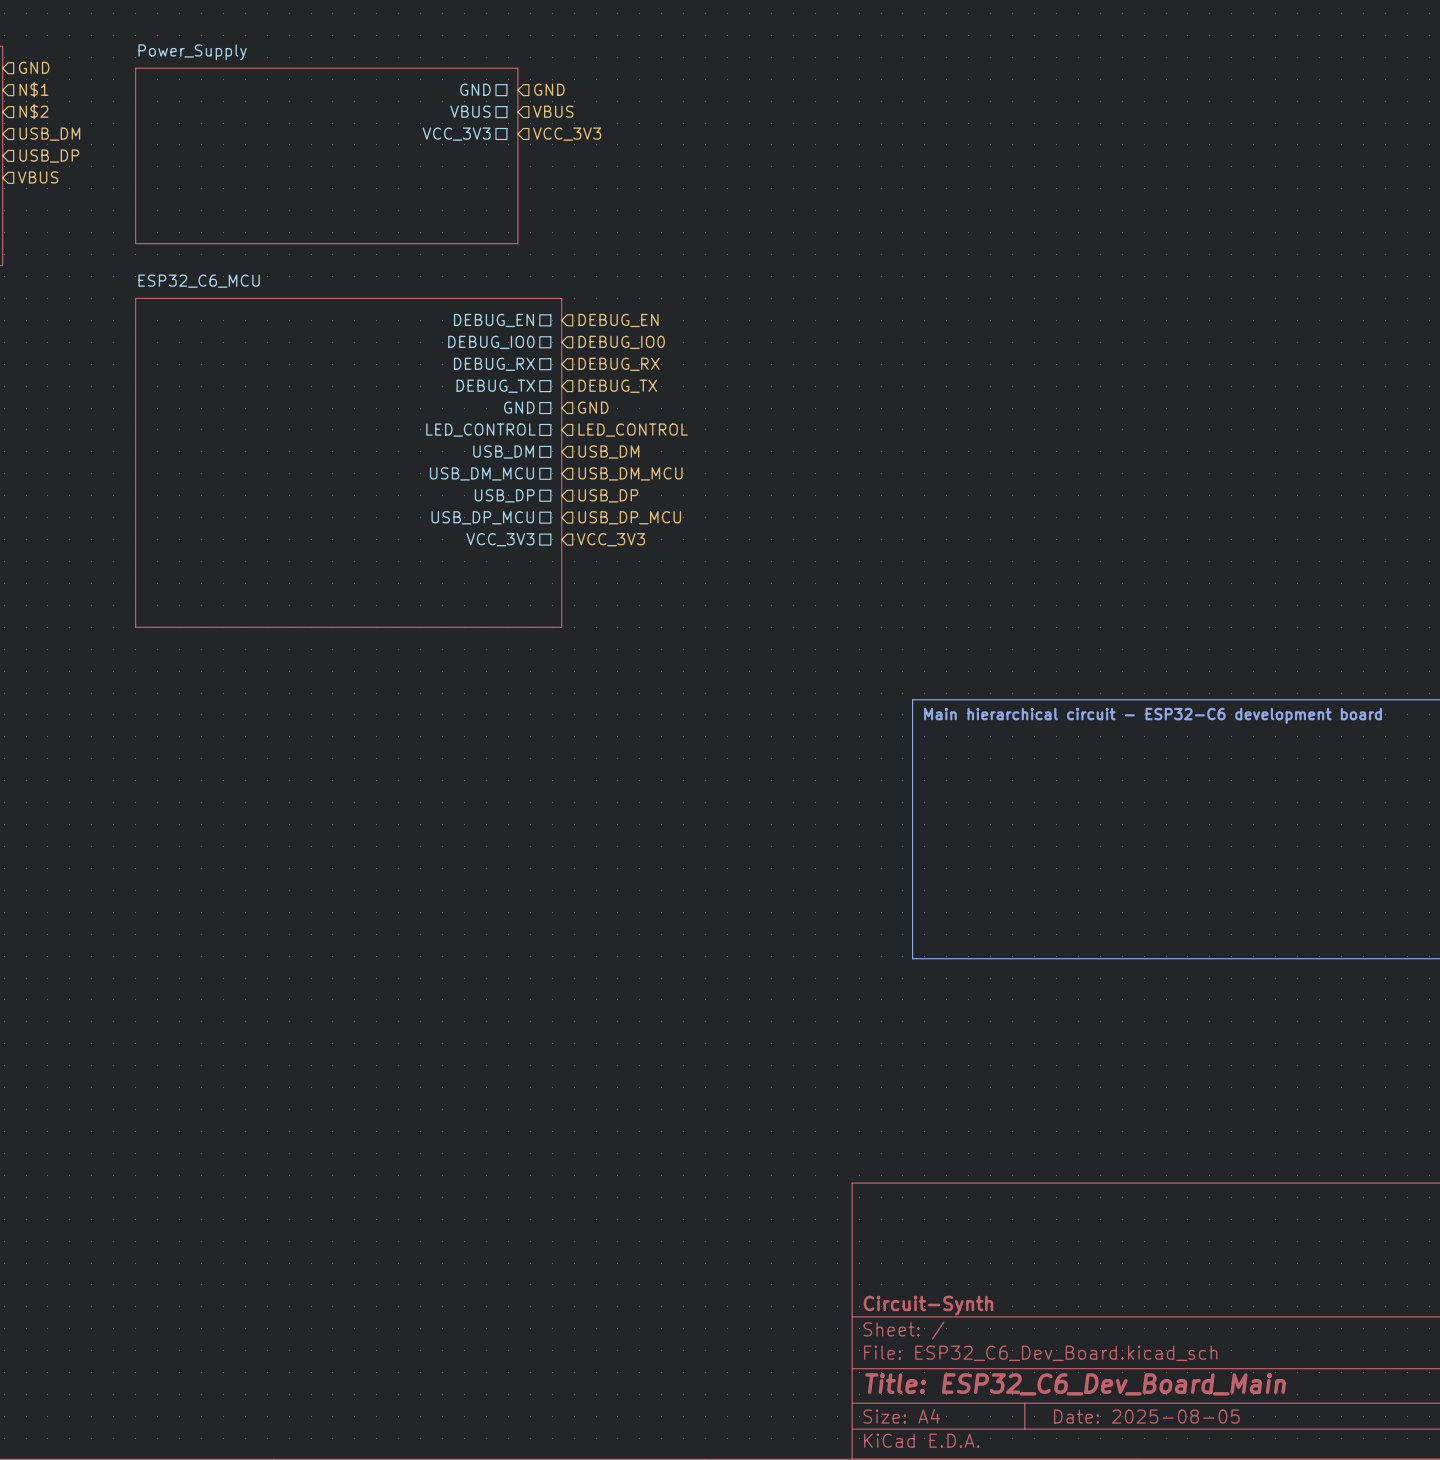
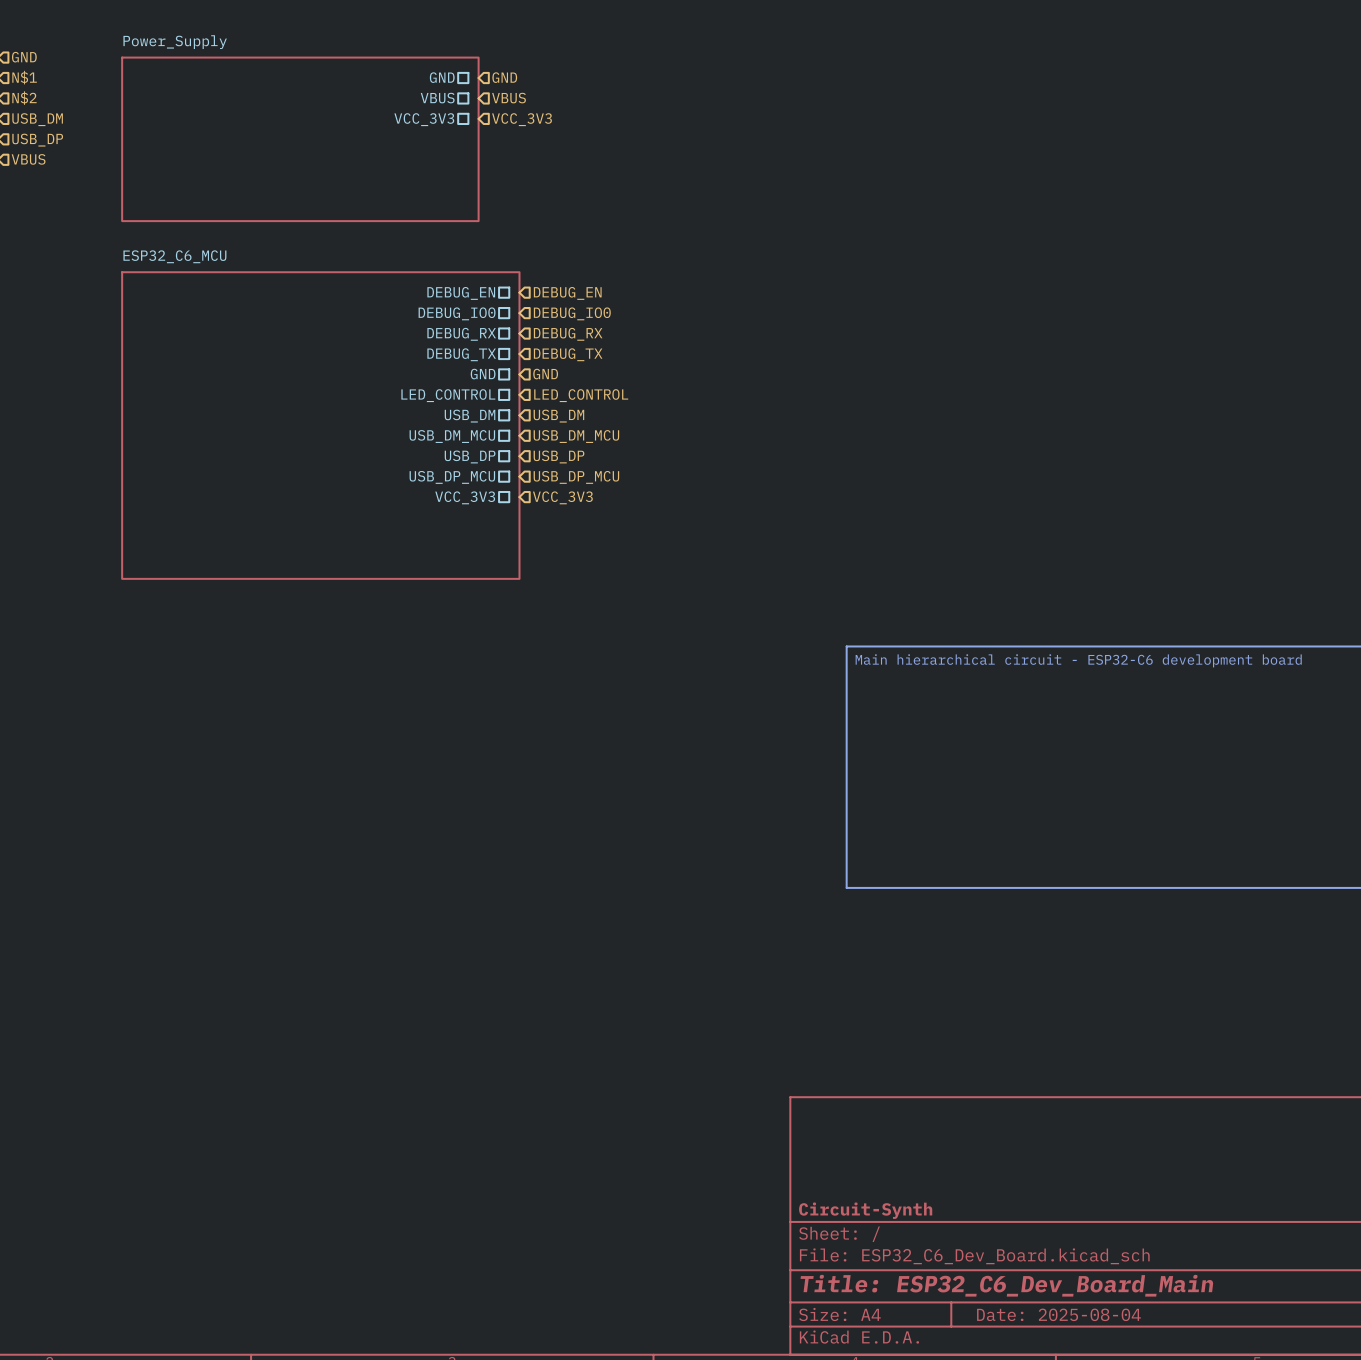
title block: Date: 2025-08-05 (1146, 1416) -> Date: 2025-08-04 (1058, 1314)

